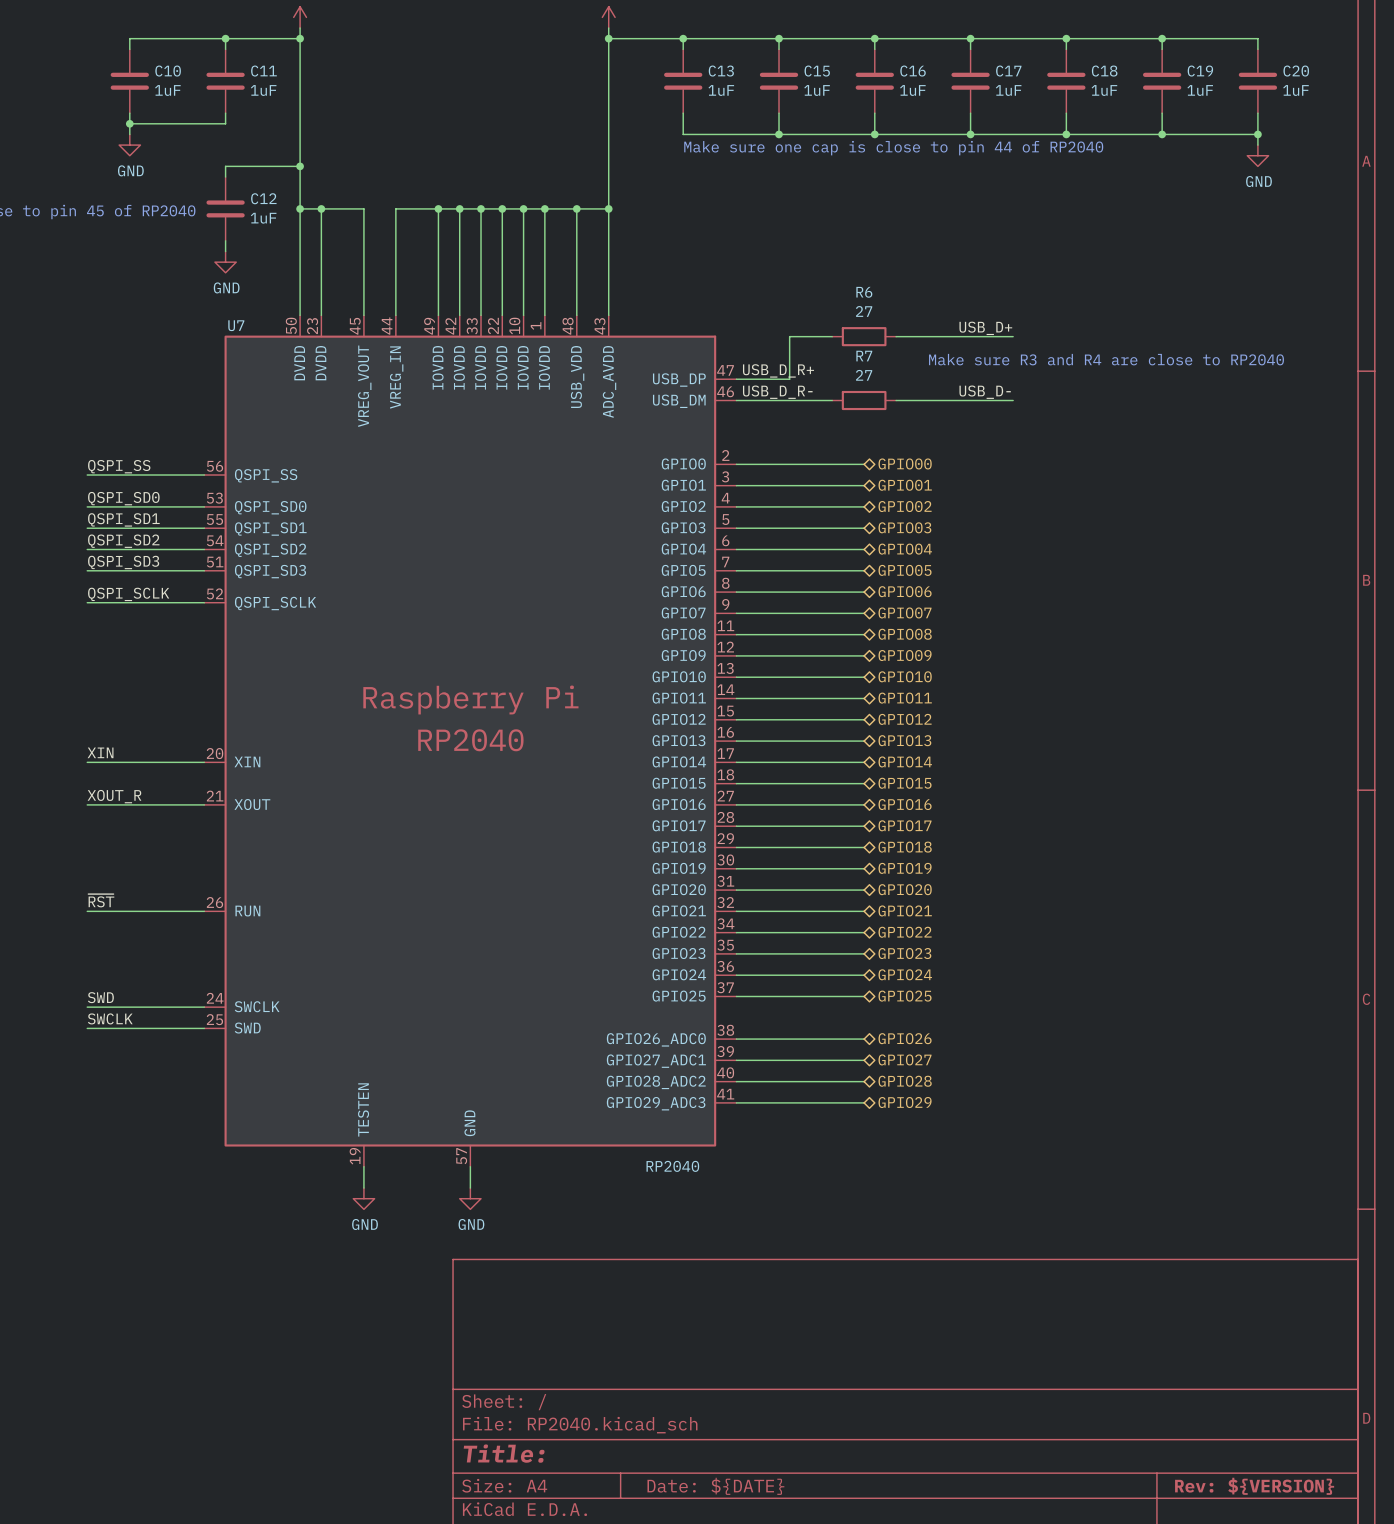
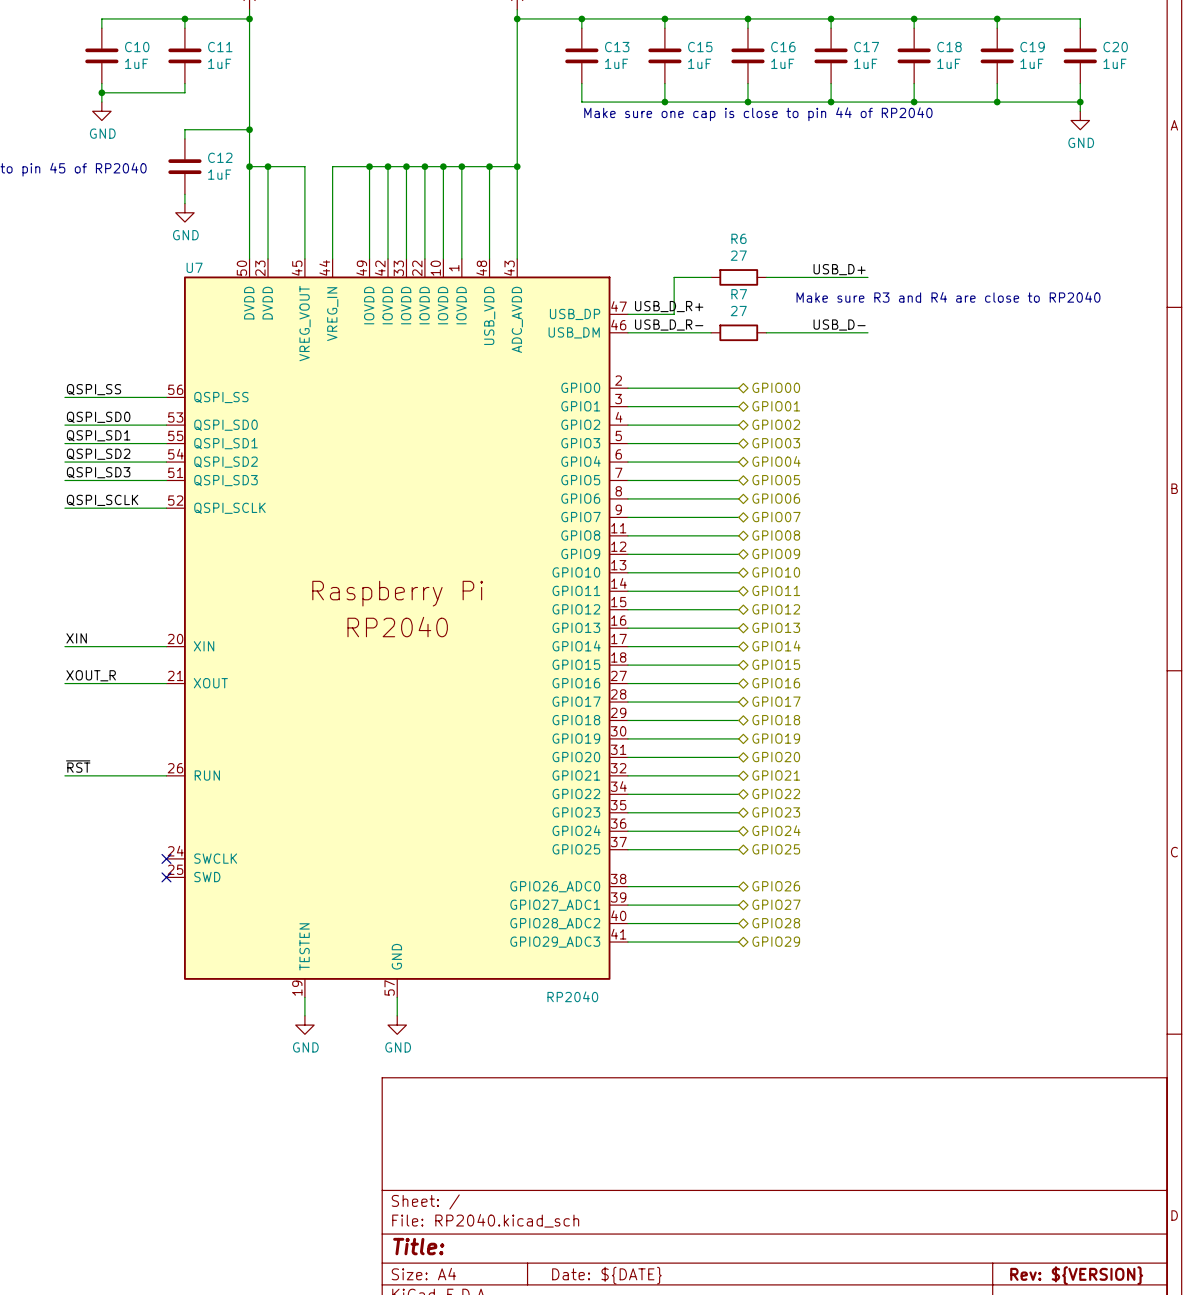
label: SWD (100, 997) -> none
wire: (87, 1007) (204, 1007) -> none
no-connect mark: none -> (166, 858)
label: SWCLK (110, 1018) -> none
wire: (87, 1028) (204, 1028) -> none
no-connect mark: none -> (166, 877)

